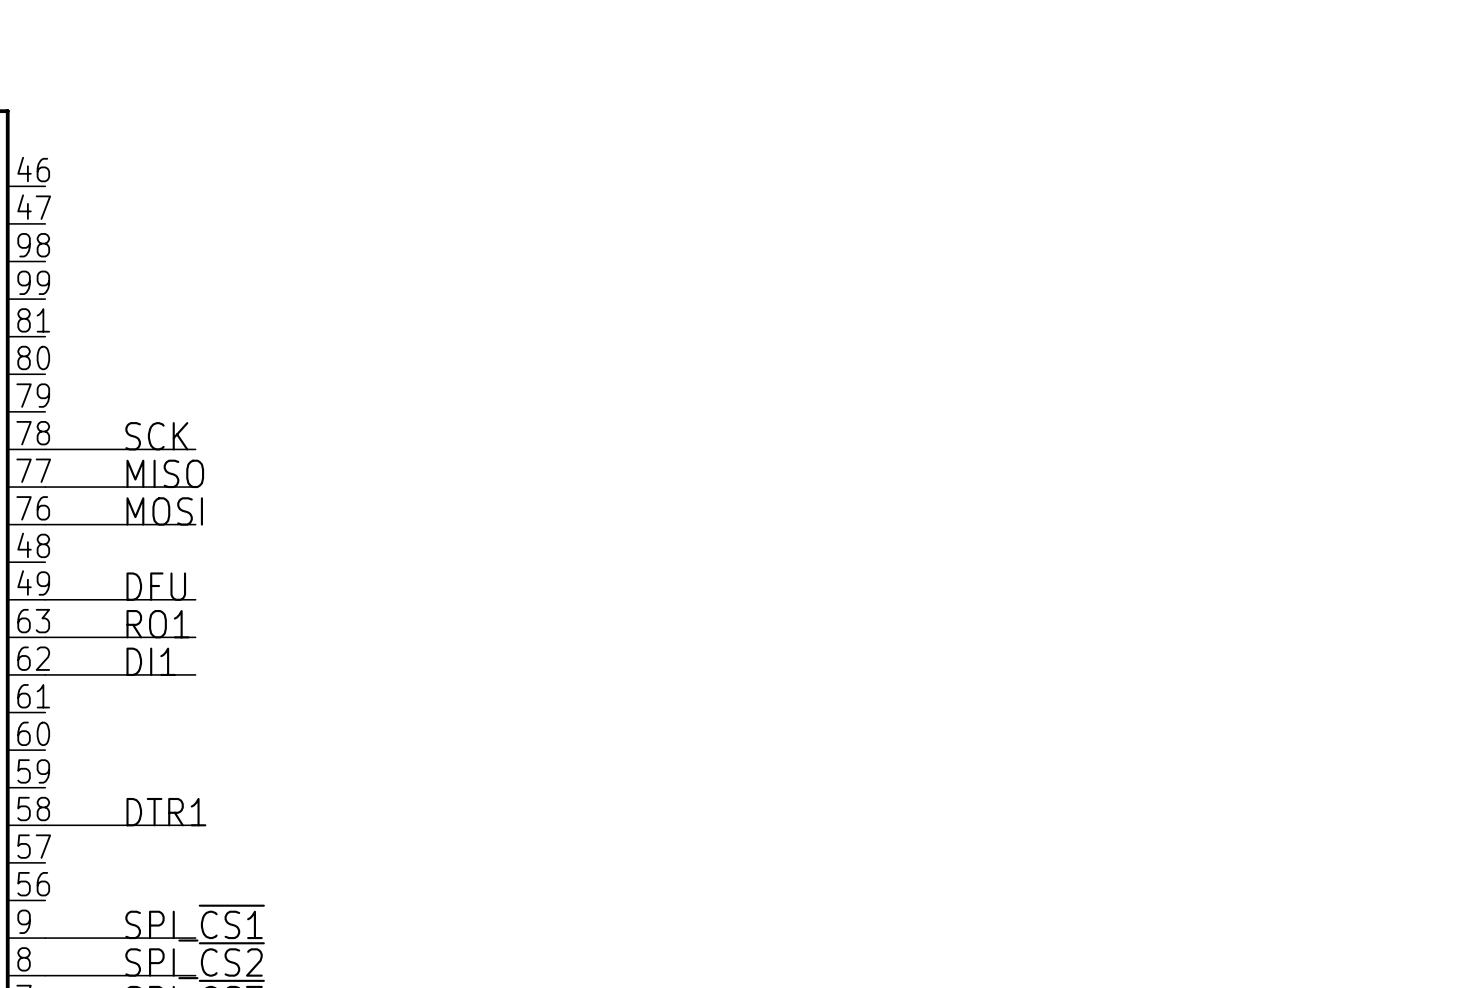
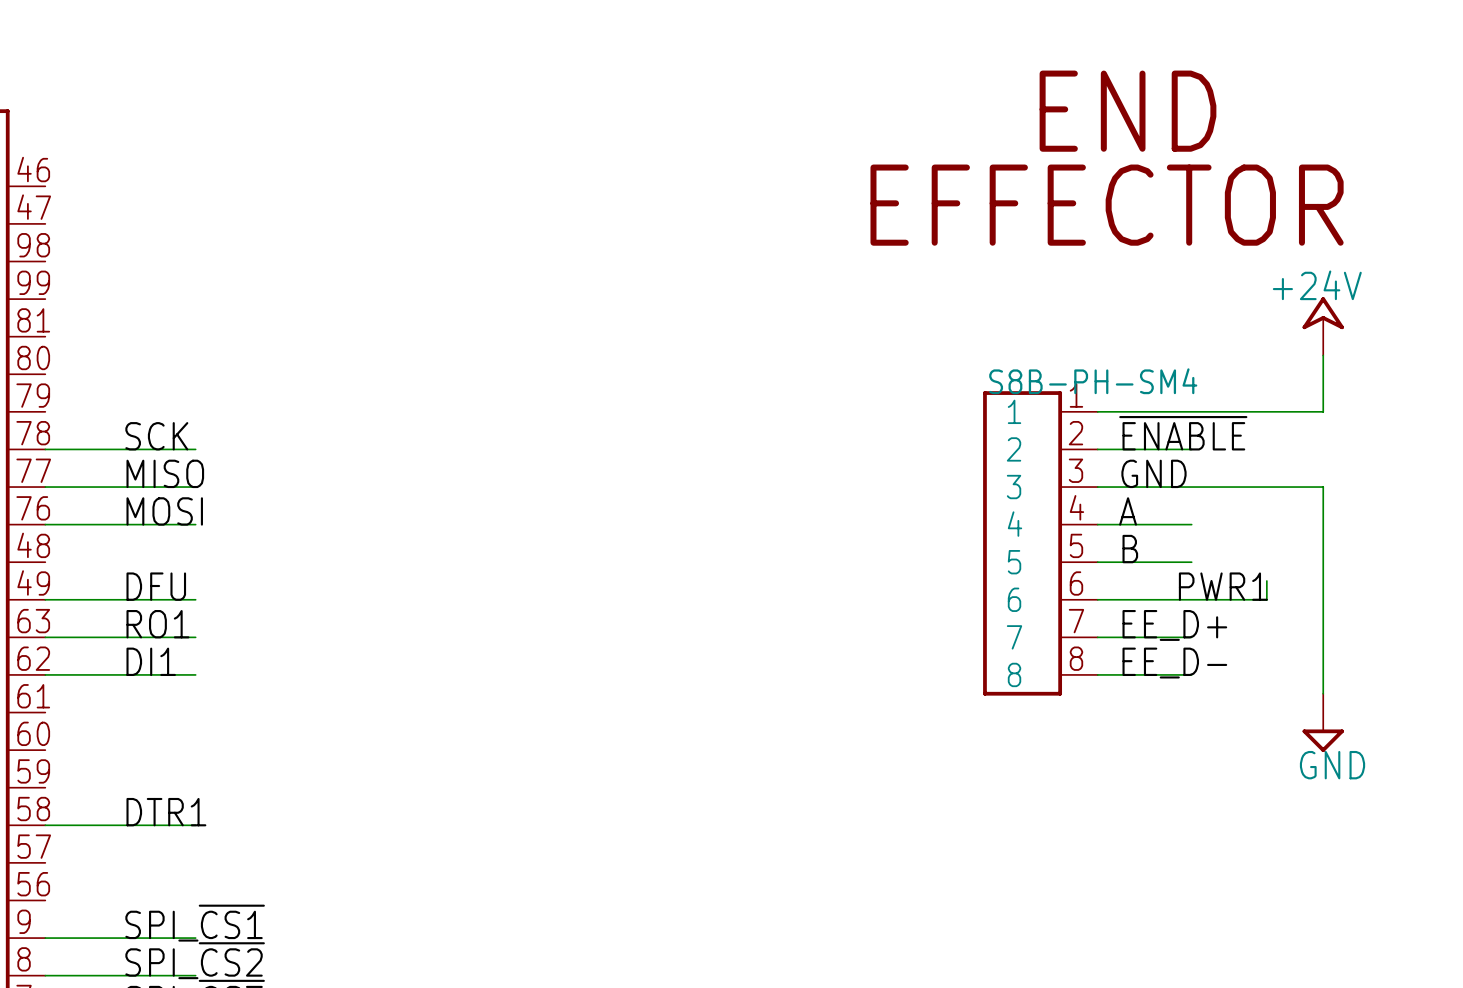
text: none -> END (1127, 111)
text: none -> EFFECTOR (1107, 205)
power symbol: none -> +24V (1323, 326)
wire: none -> (1323, 355) (1323, 411) (1097, 411)
label: none -> ~{ENABLE} (1183, 433)
wire: none -> (1097, 449) (1191, 449)
label: none -> GND (1153, 473)
wire: none -> (1097, 487) (1323, 487) (1323, 693)
label: none -> A (1128, 511)
wire: none -> (1097, 524) (1191, 524)
part: none -> S8B-PH-SM4 (1040, 543)
label: none -> B (1130, 549)
wire: none -> (1097, 562) (1191, 562)
wire: none -> (1266, 580) (1266, 599) (1097, 599)
label: none -> PWR1 (1223, 586)
label: none -> EE_D+ (1174, 625)
wire: none -> (1097, 637) (1191, 637)
label: none -> EE_D- (1174, 663)
wire: none -> (1097, 674) (1191, 674)
power symbol: none -> GND (1323, 722)

